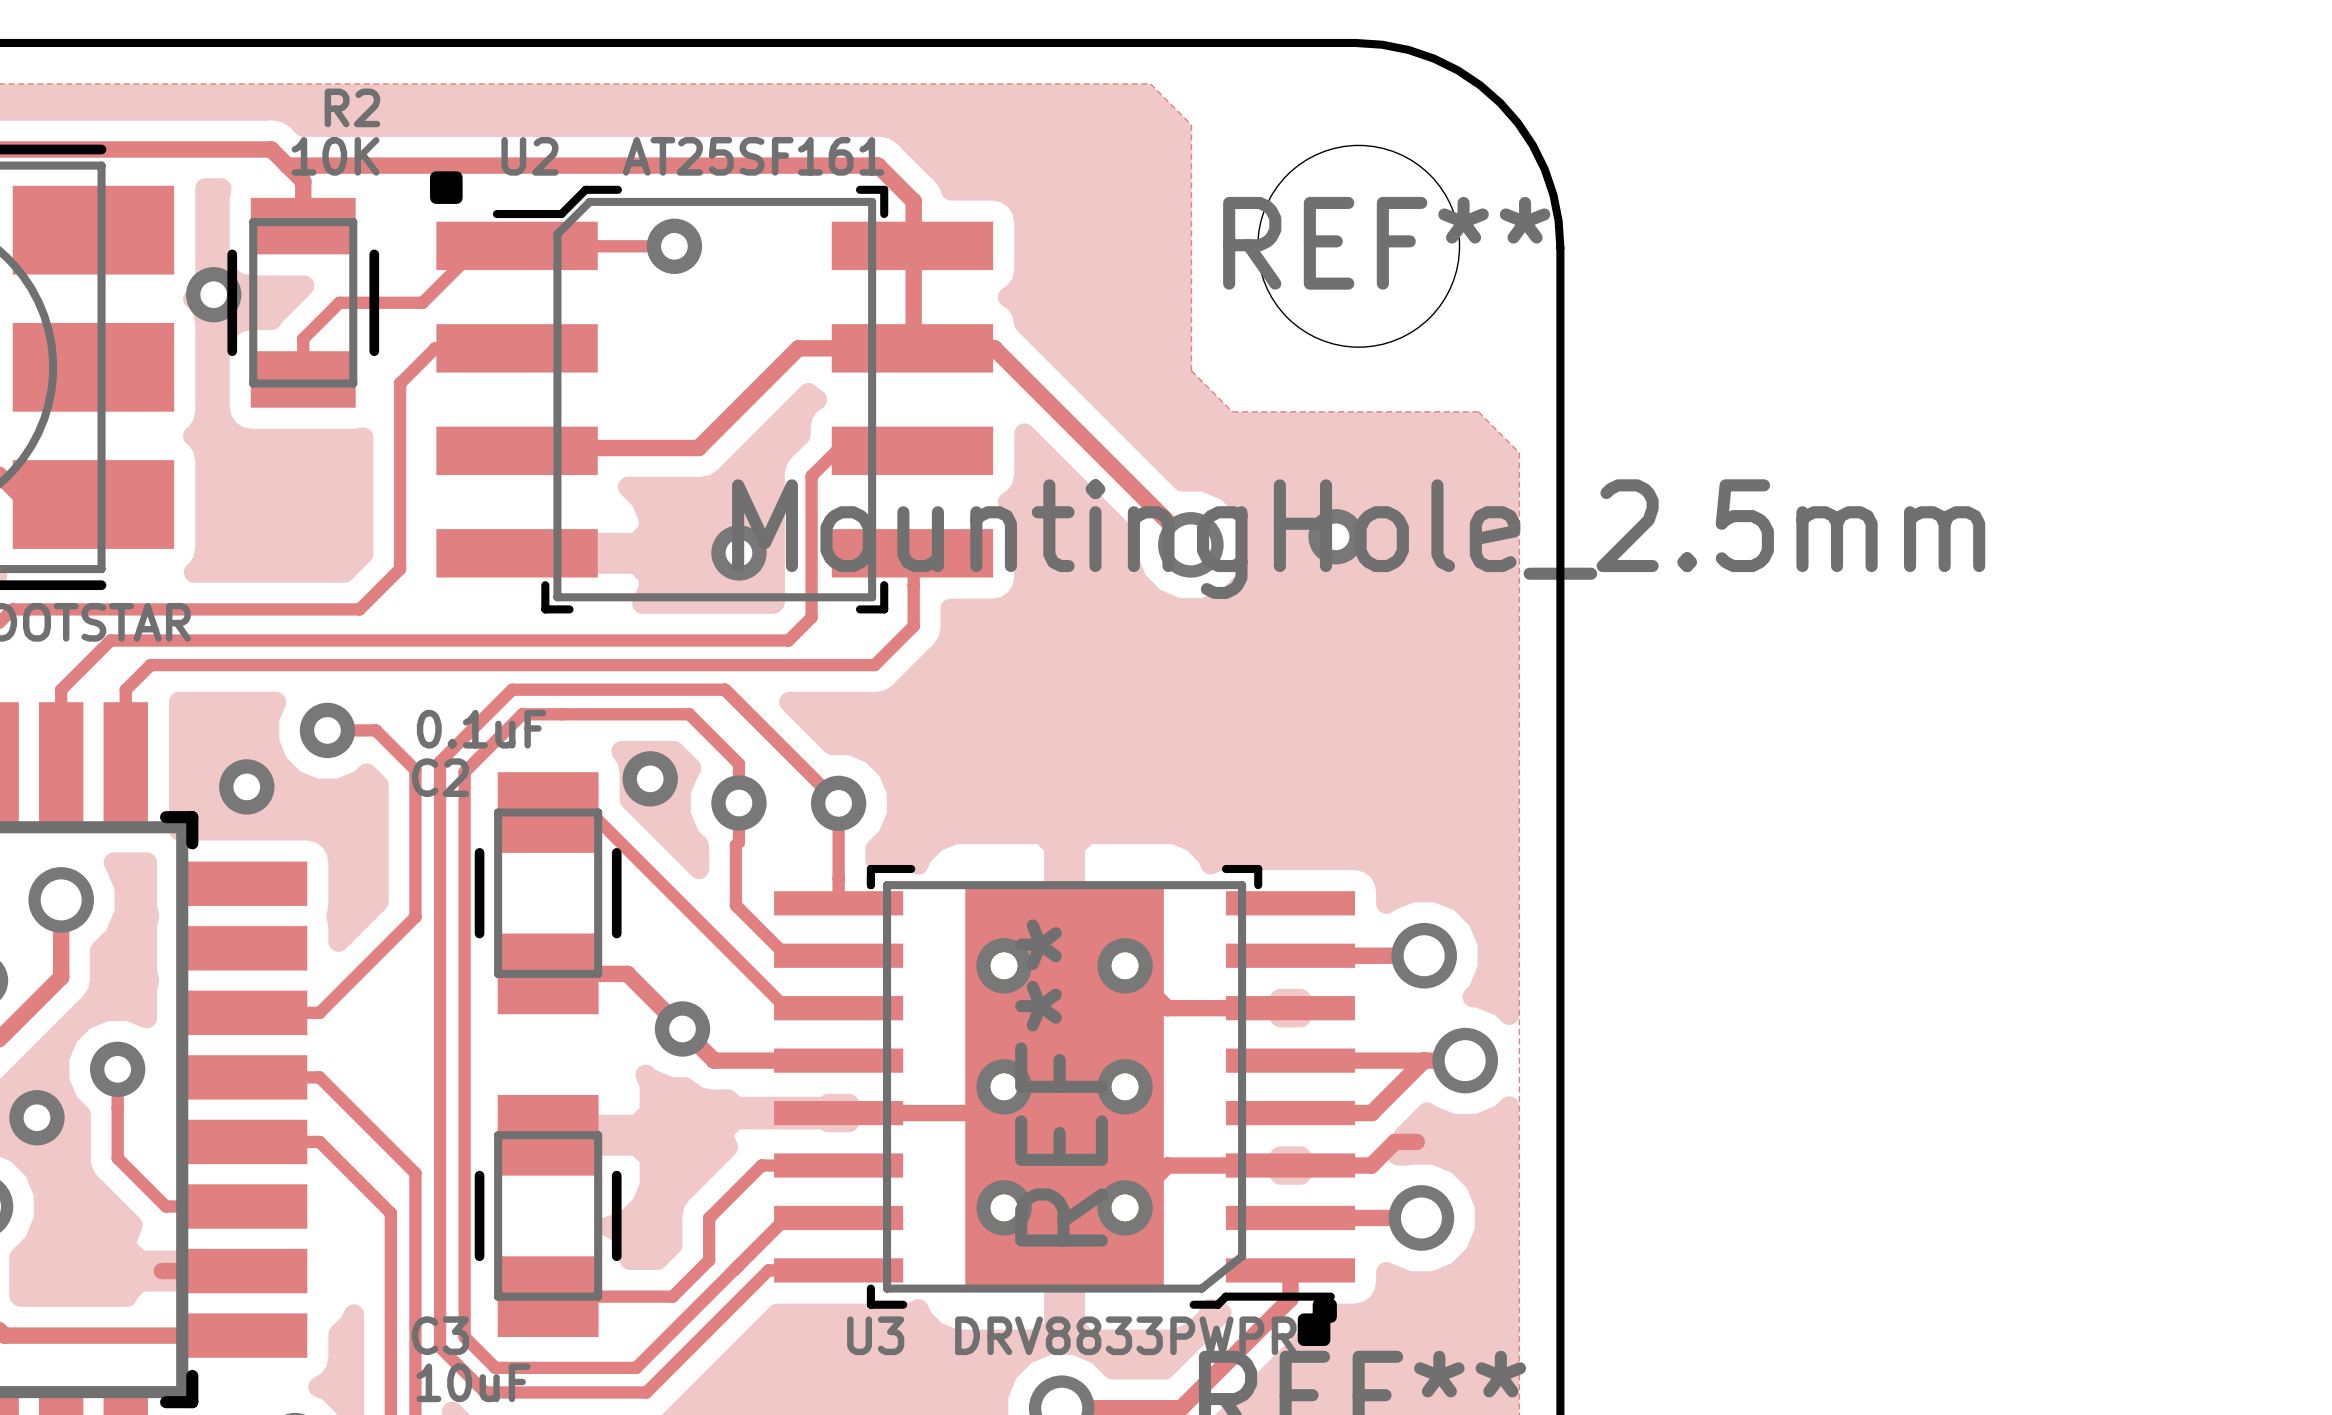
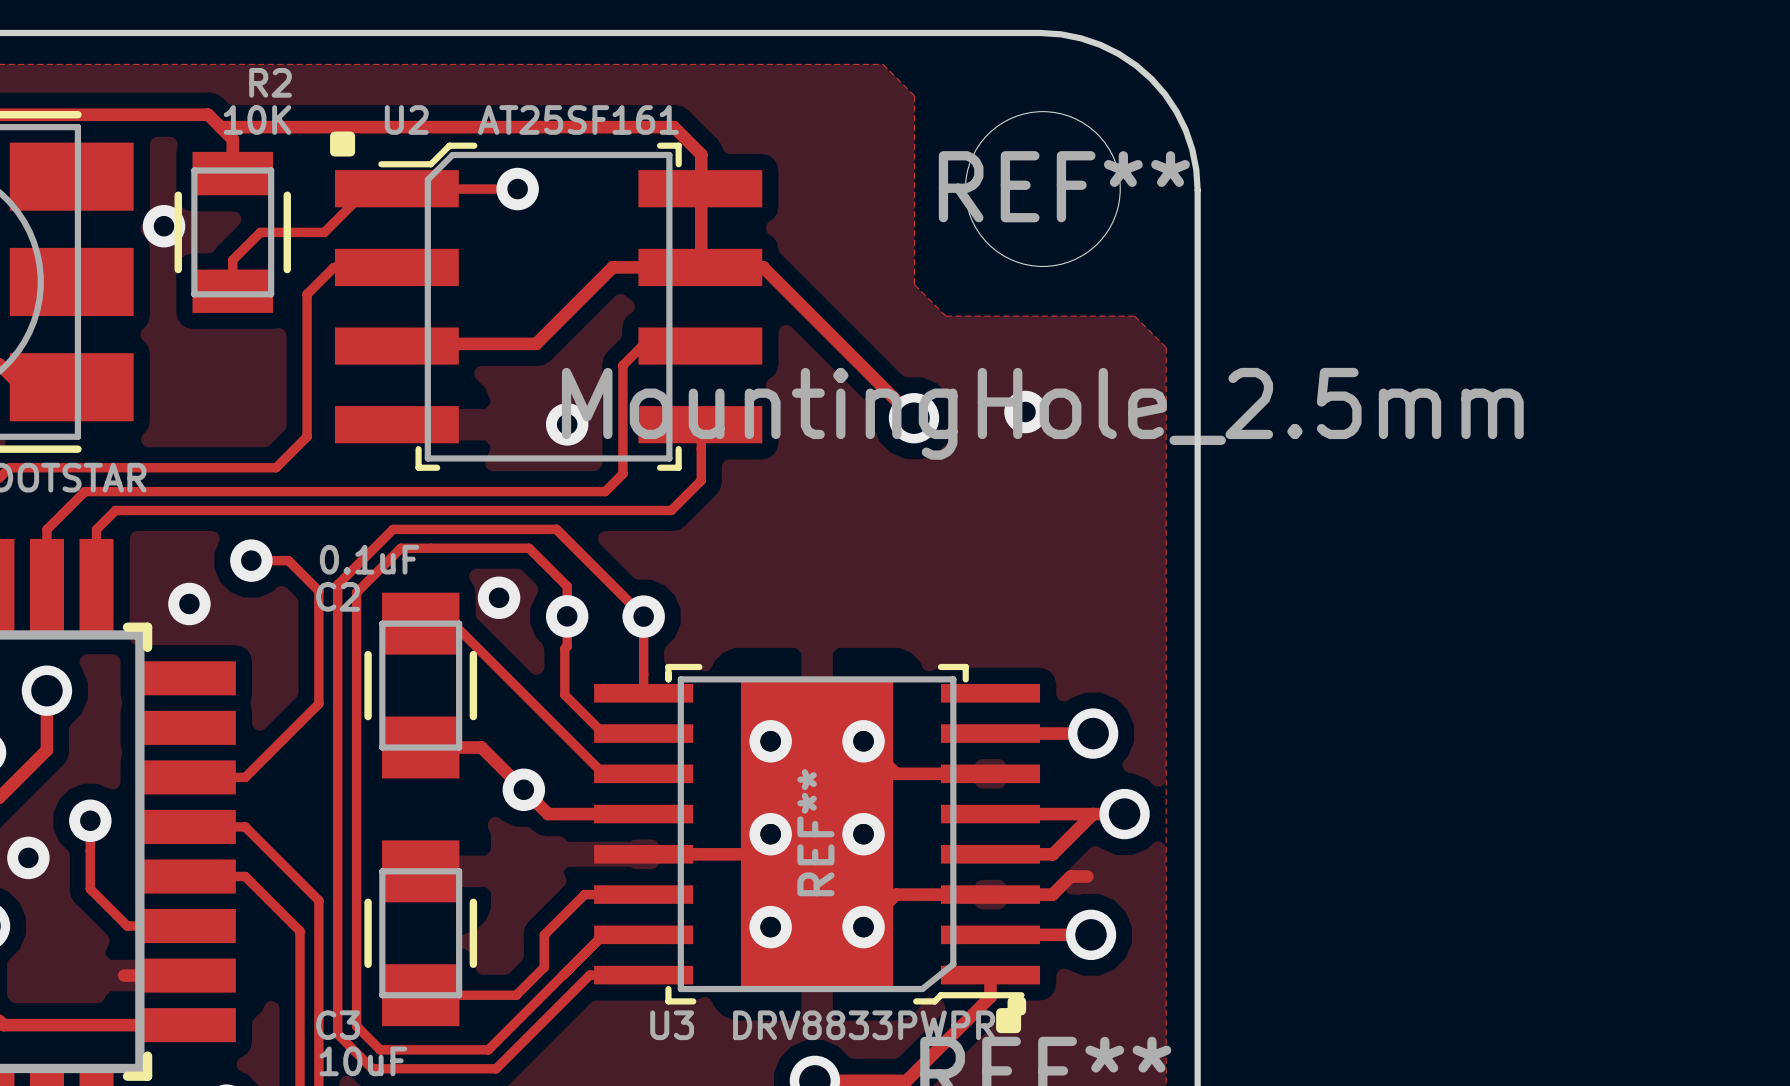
U3 footprint: [774, 864, 1356, 1323] -> [594, 663, 1041, 1016]

